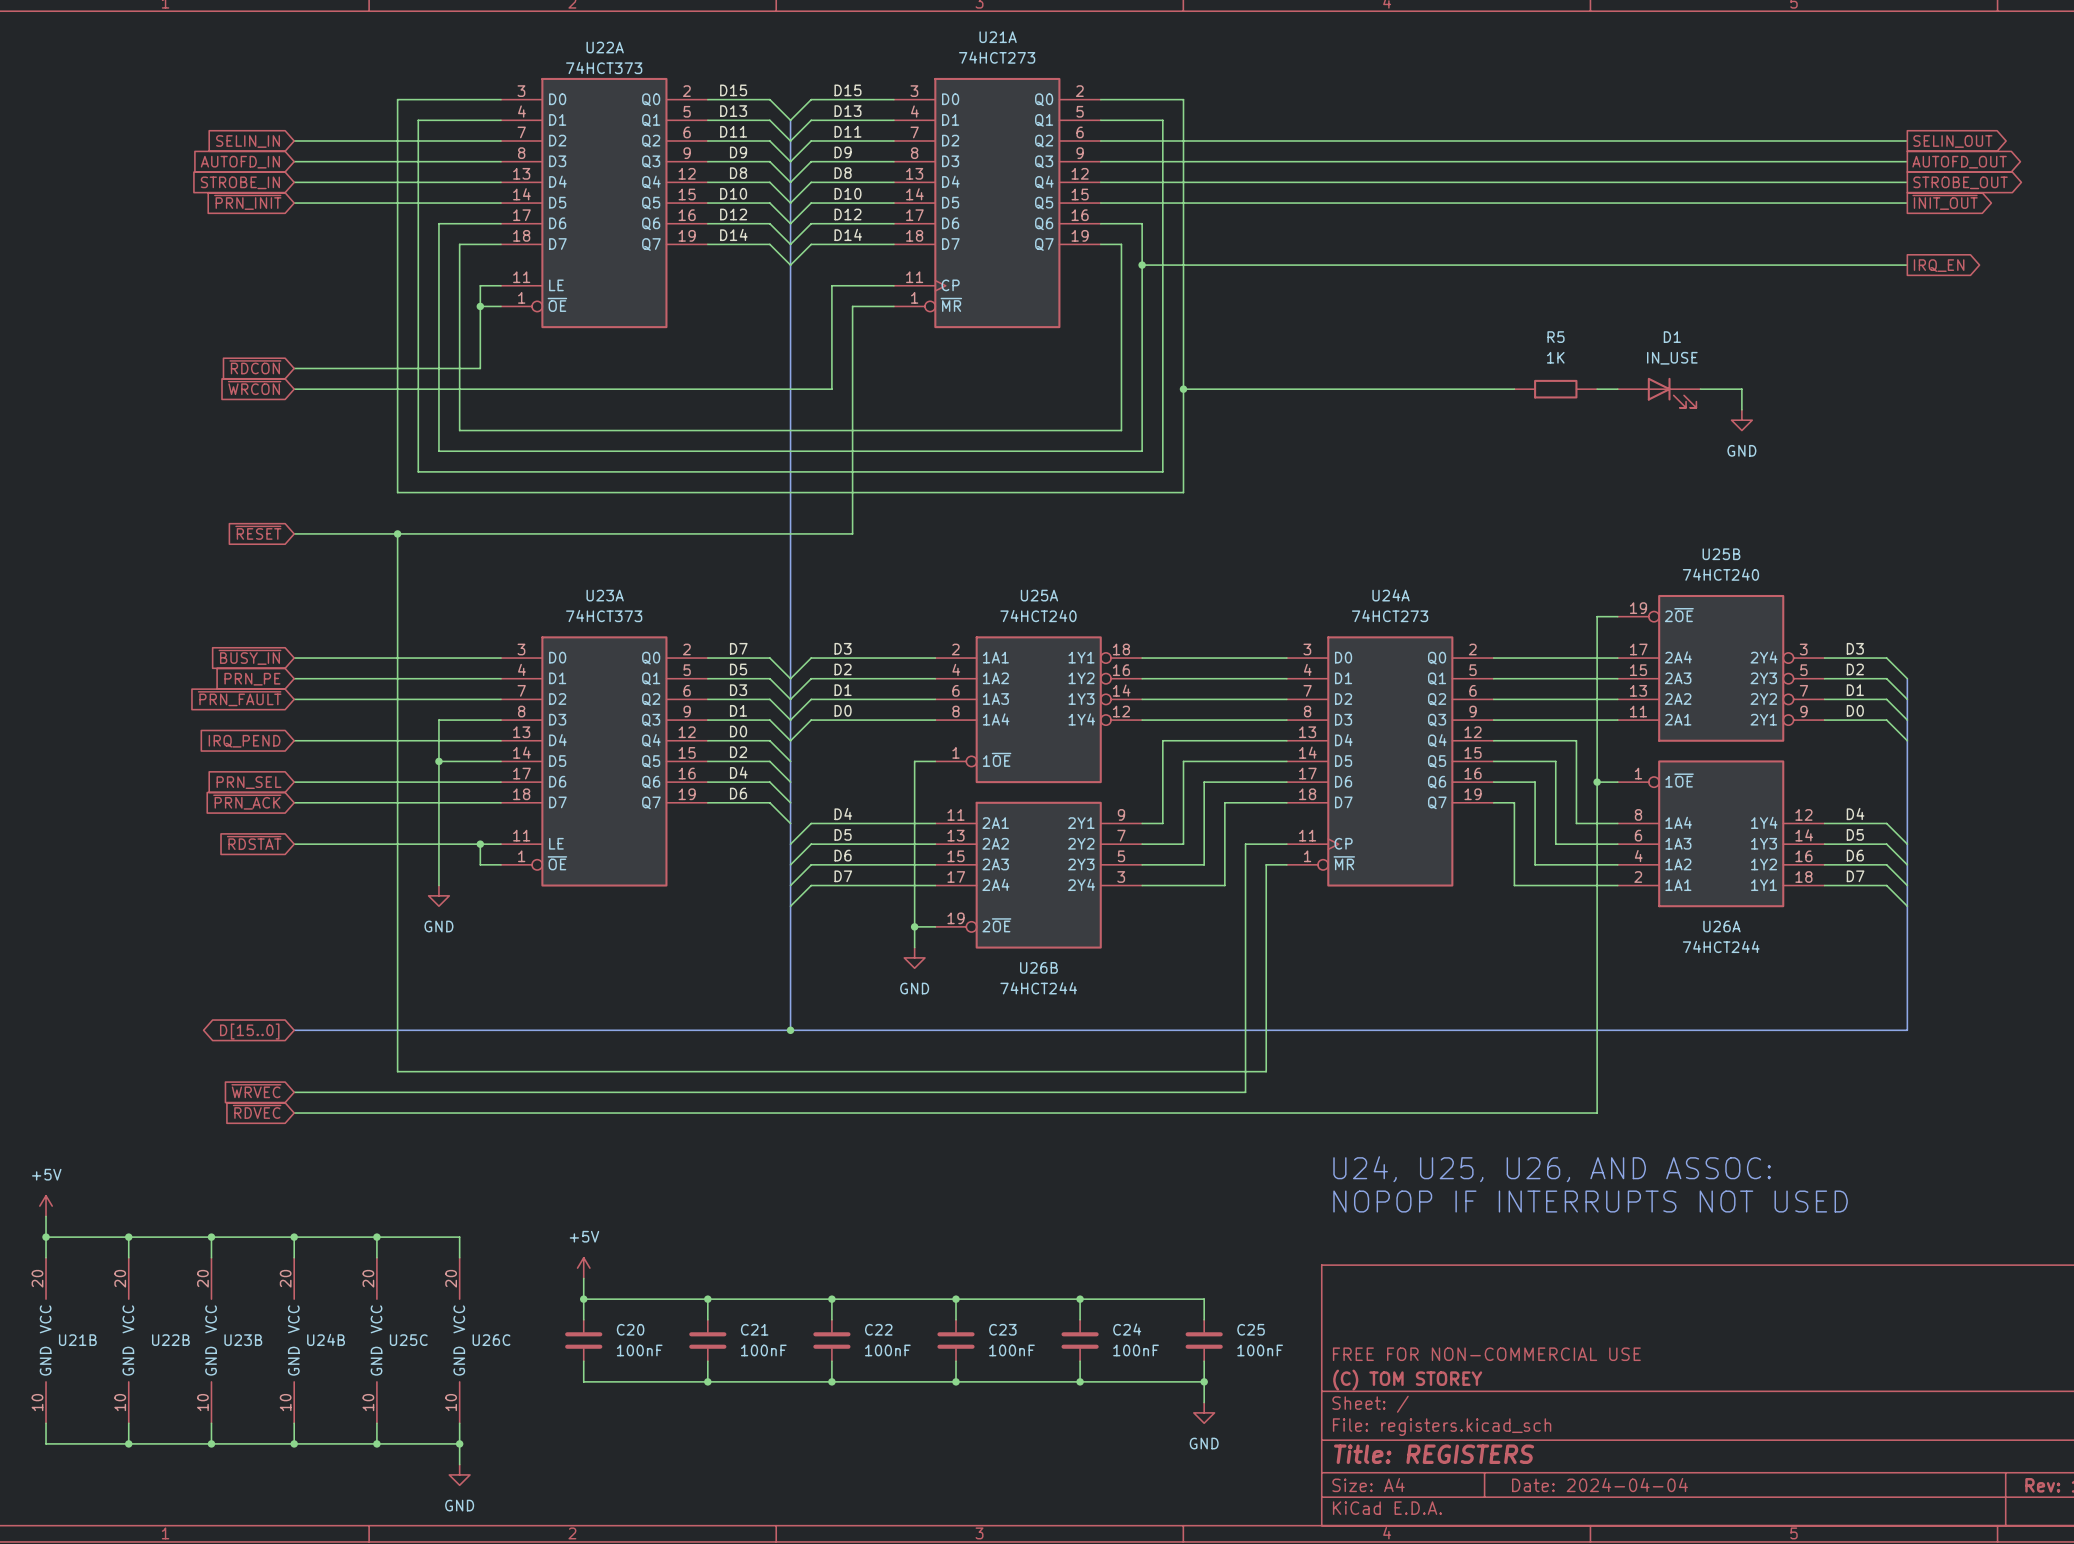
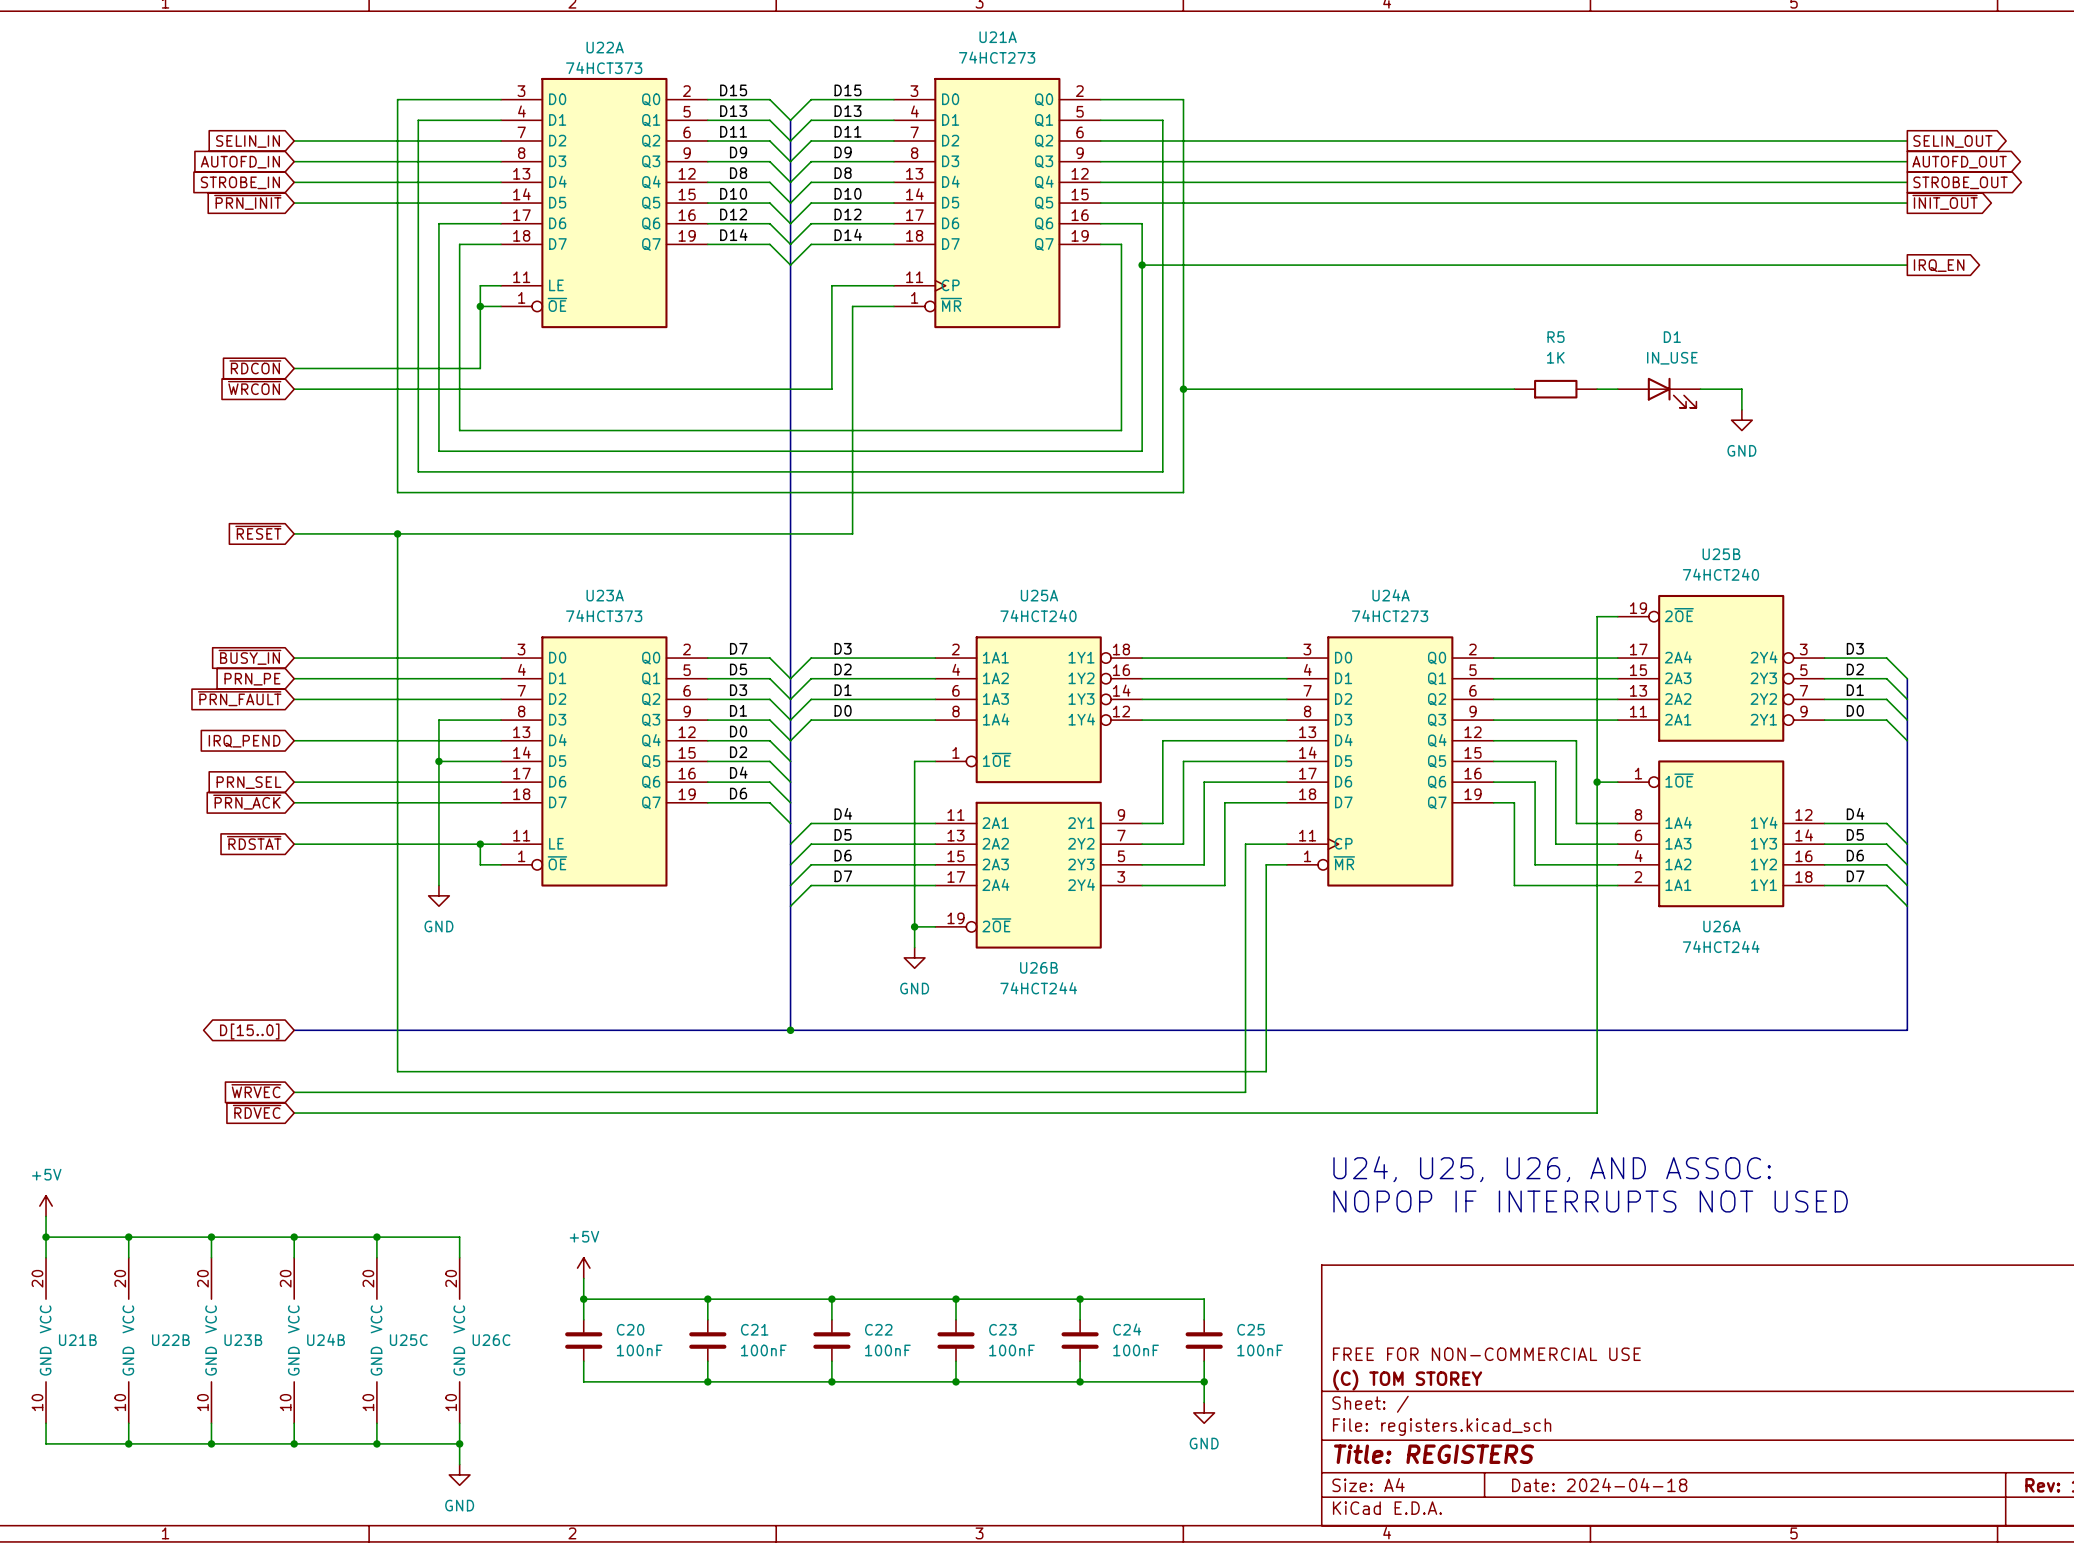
title block: Date: 2024-04-04 (1599, 1485) -> Date: 2024-04-18 (1599, 1485)

